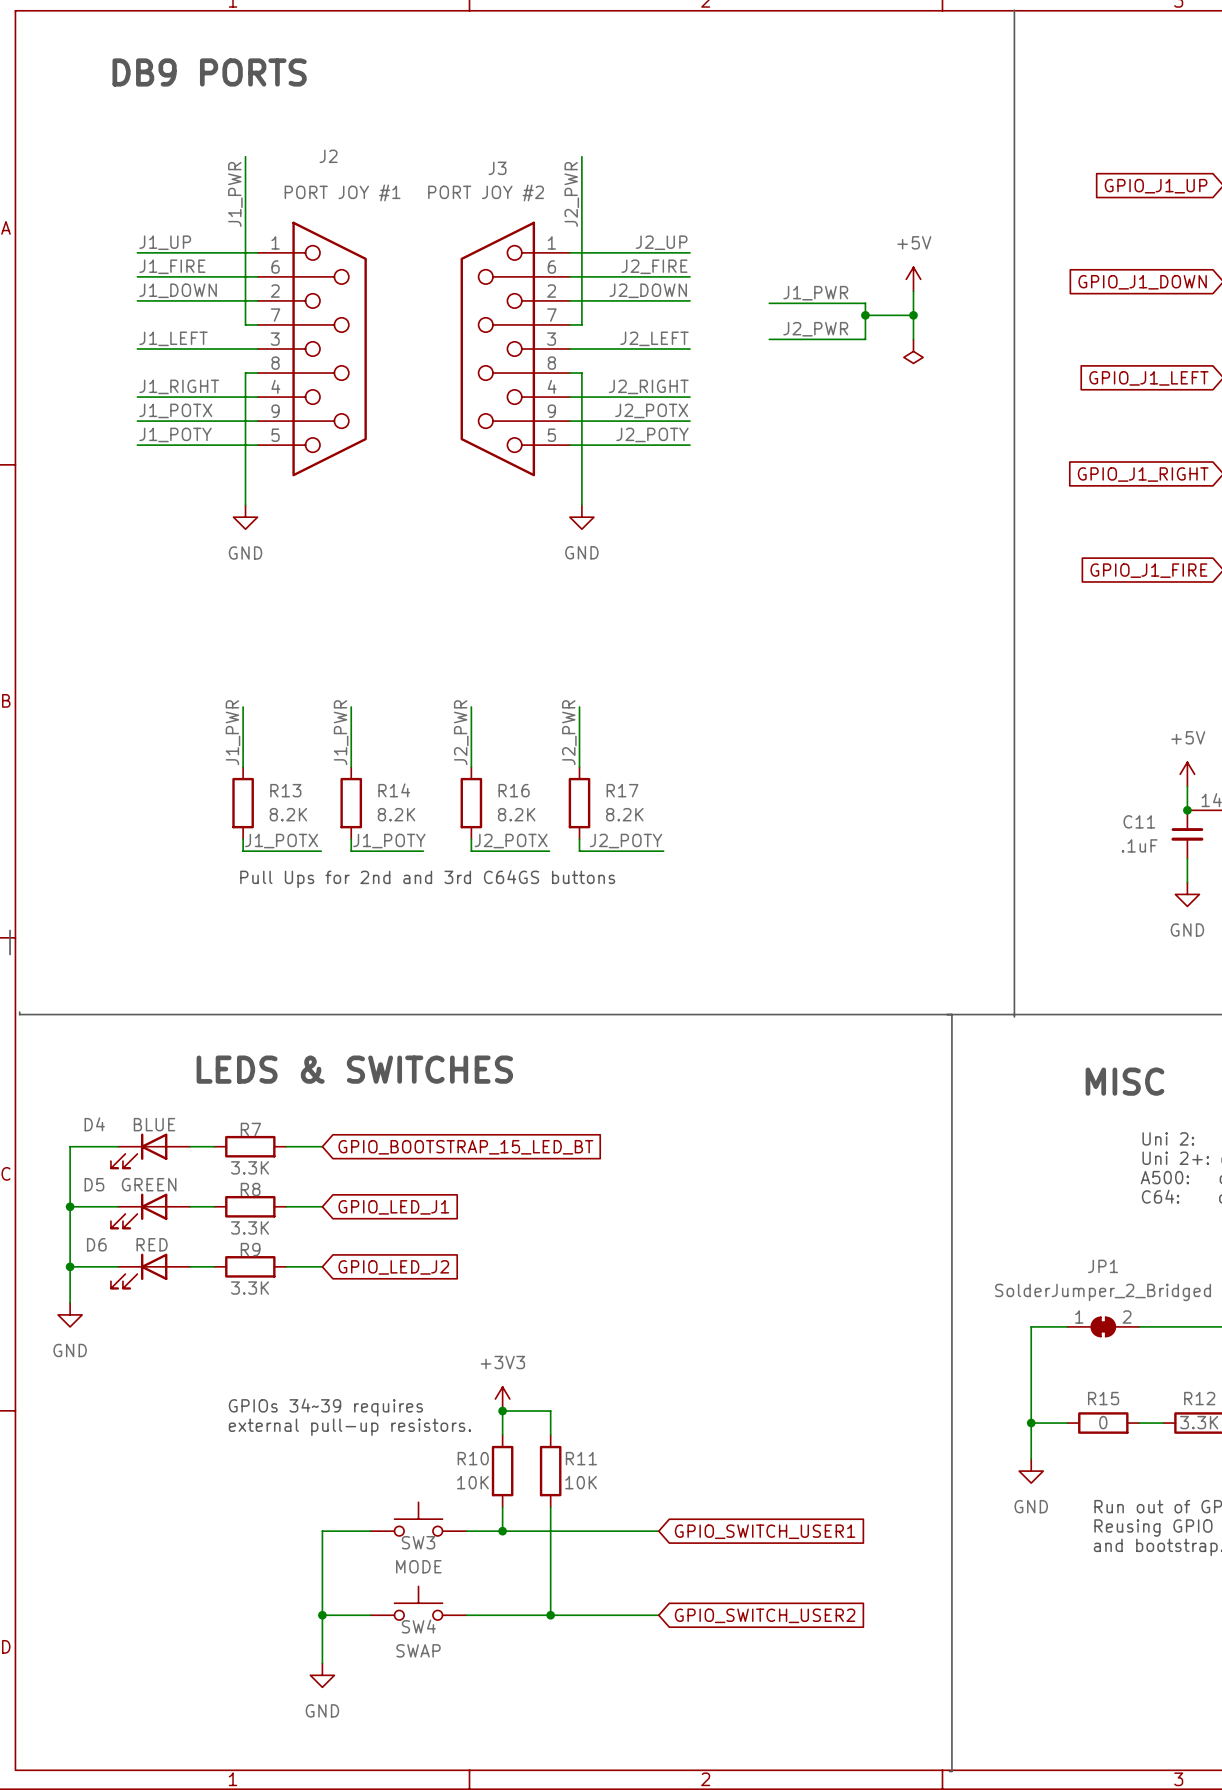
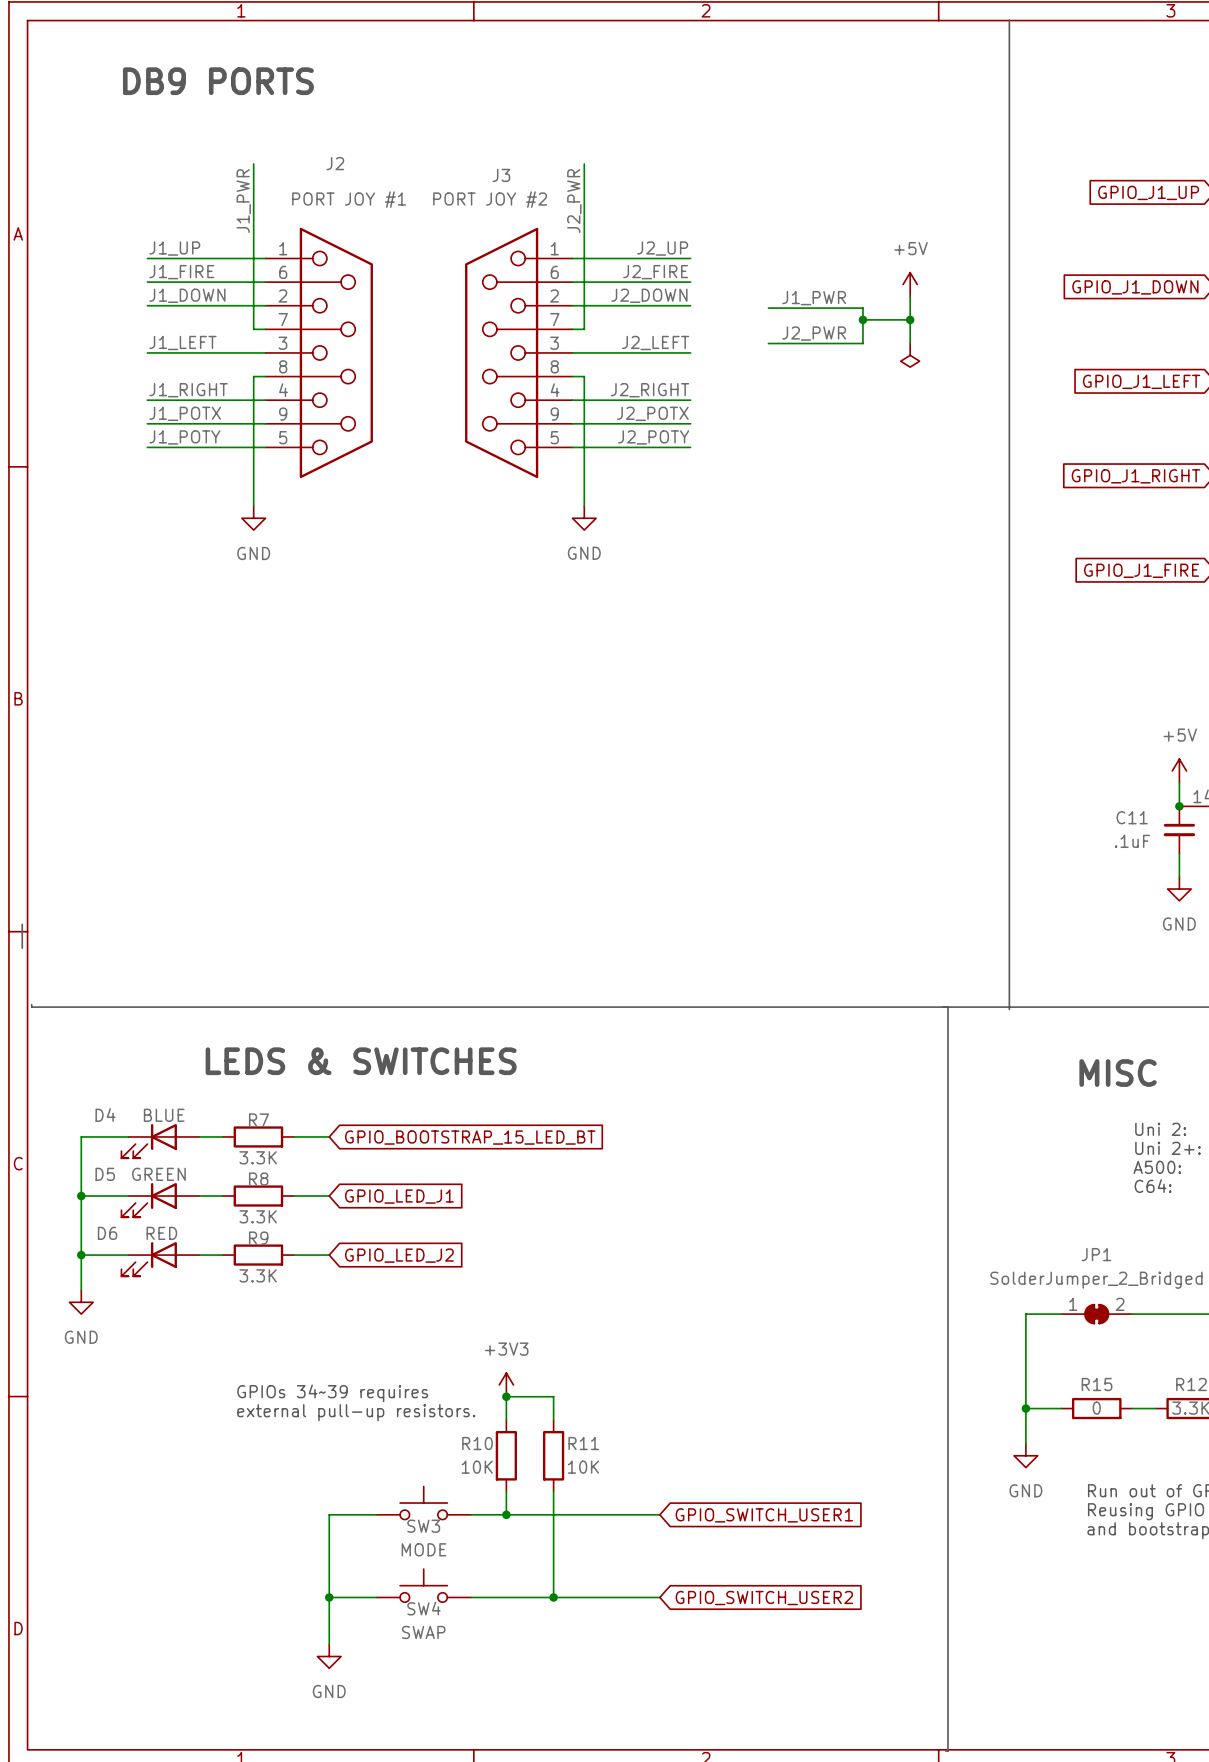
wire: (243, 707) (243, 767) -> none
wire: (351, 707) (351, 767) -> none
wire: (471, 707) (471, 767) -> none
wire: (579, 707) (579, 767) -> none
label: J1_PWR (232, 732) -> none
label: J1_PWR (341, 732) -> none
label: J2_PWR (461, 732) -> none
label: J2_PWR (569, 732) -> none
R13: 8.2K (243, 803) -> none
R14: 8.2K (351, 803) -> none
R16: 8.2K (471, 803) -> none
R17: 8.2K (579, 803) -> none
wire: (243, 839) (243, 851) (321, 851) -> none
wire: (351, 839) (351, 851) (423, 851) -> none
wire: (471, 839) (471, 851) (549, 851) -> none
wire: (579, 839) (579, 851) (663, 851) -> none
label: J1_POTX (281, 841) -> none
label: J1_POTY (389, 841) -> none
label: J2_POTX (511, 841) -> none
label: J2_POTY (626, 841) -> none
text: Pull Ups for 2nd and 3rd C64GS buttons (427, 879) -> none

